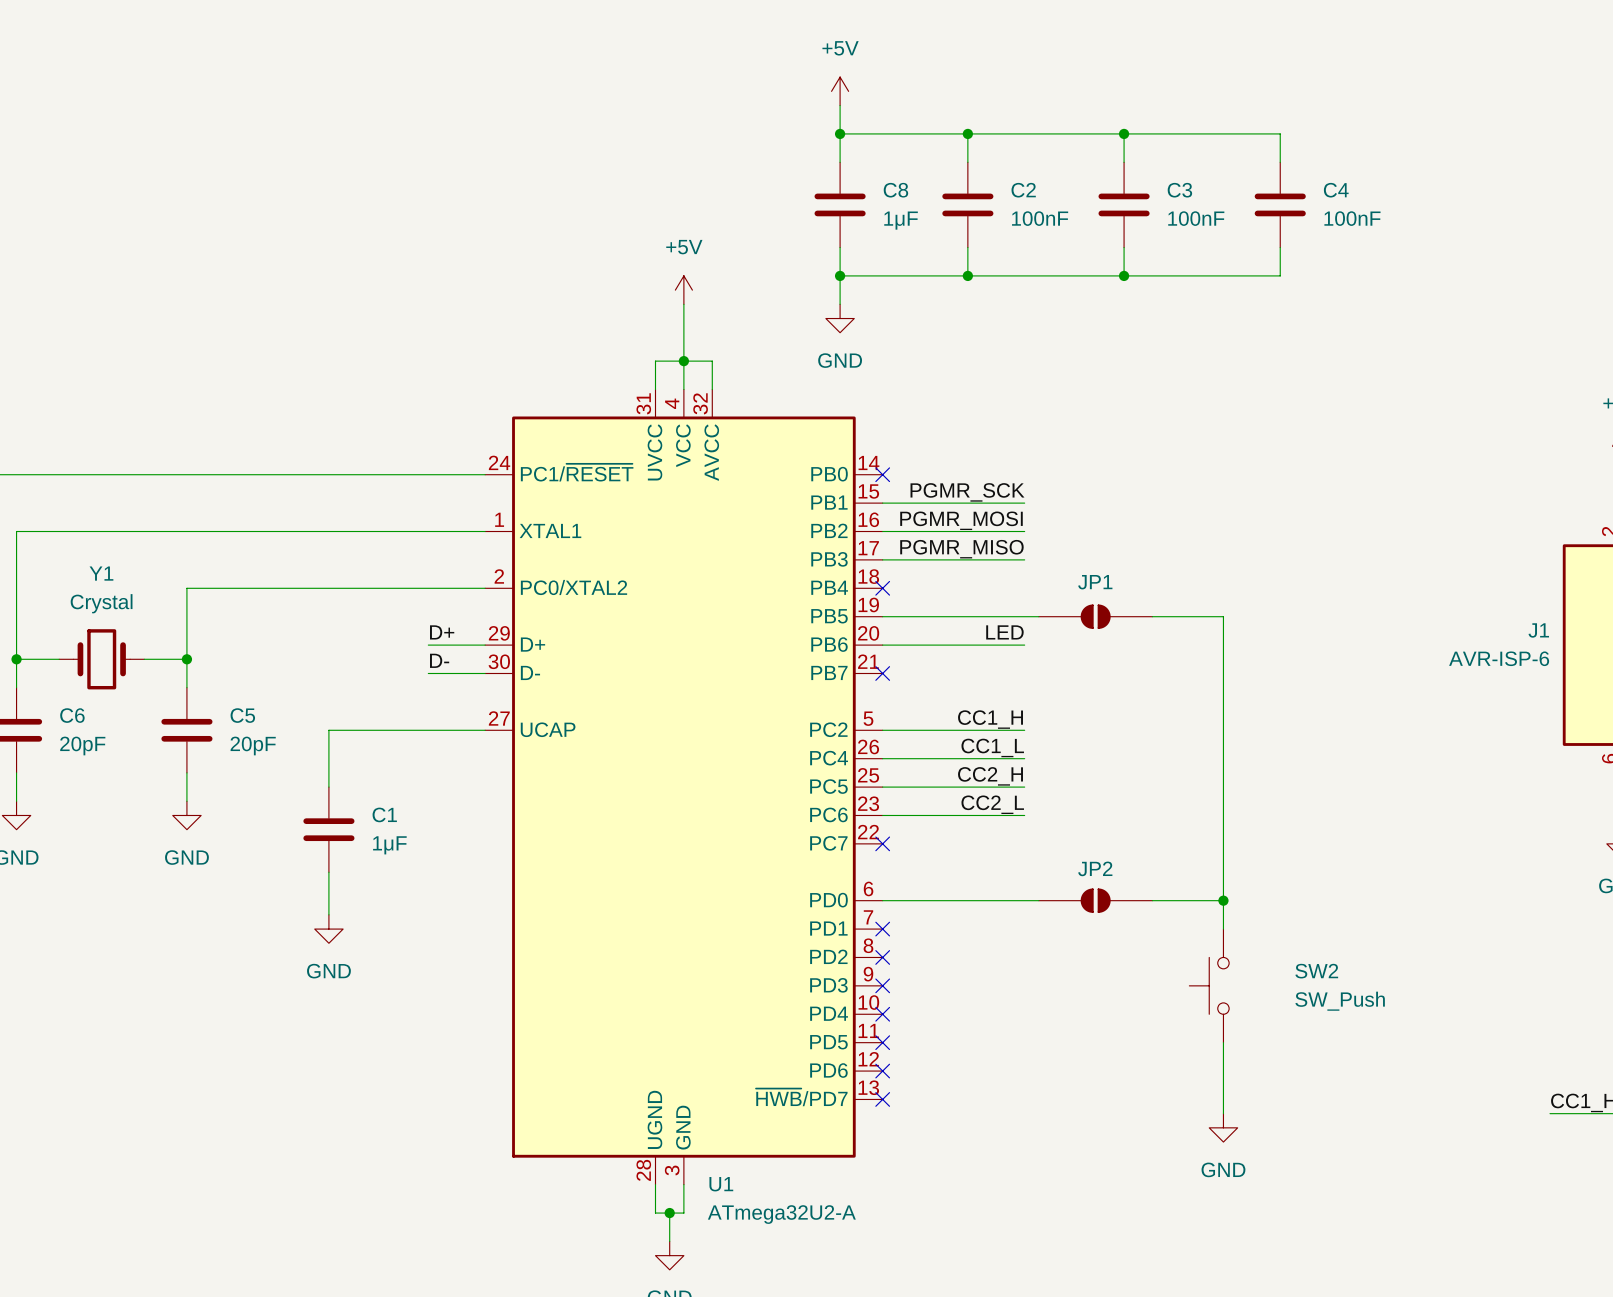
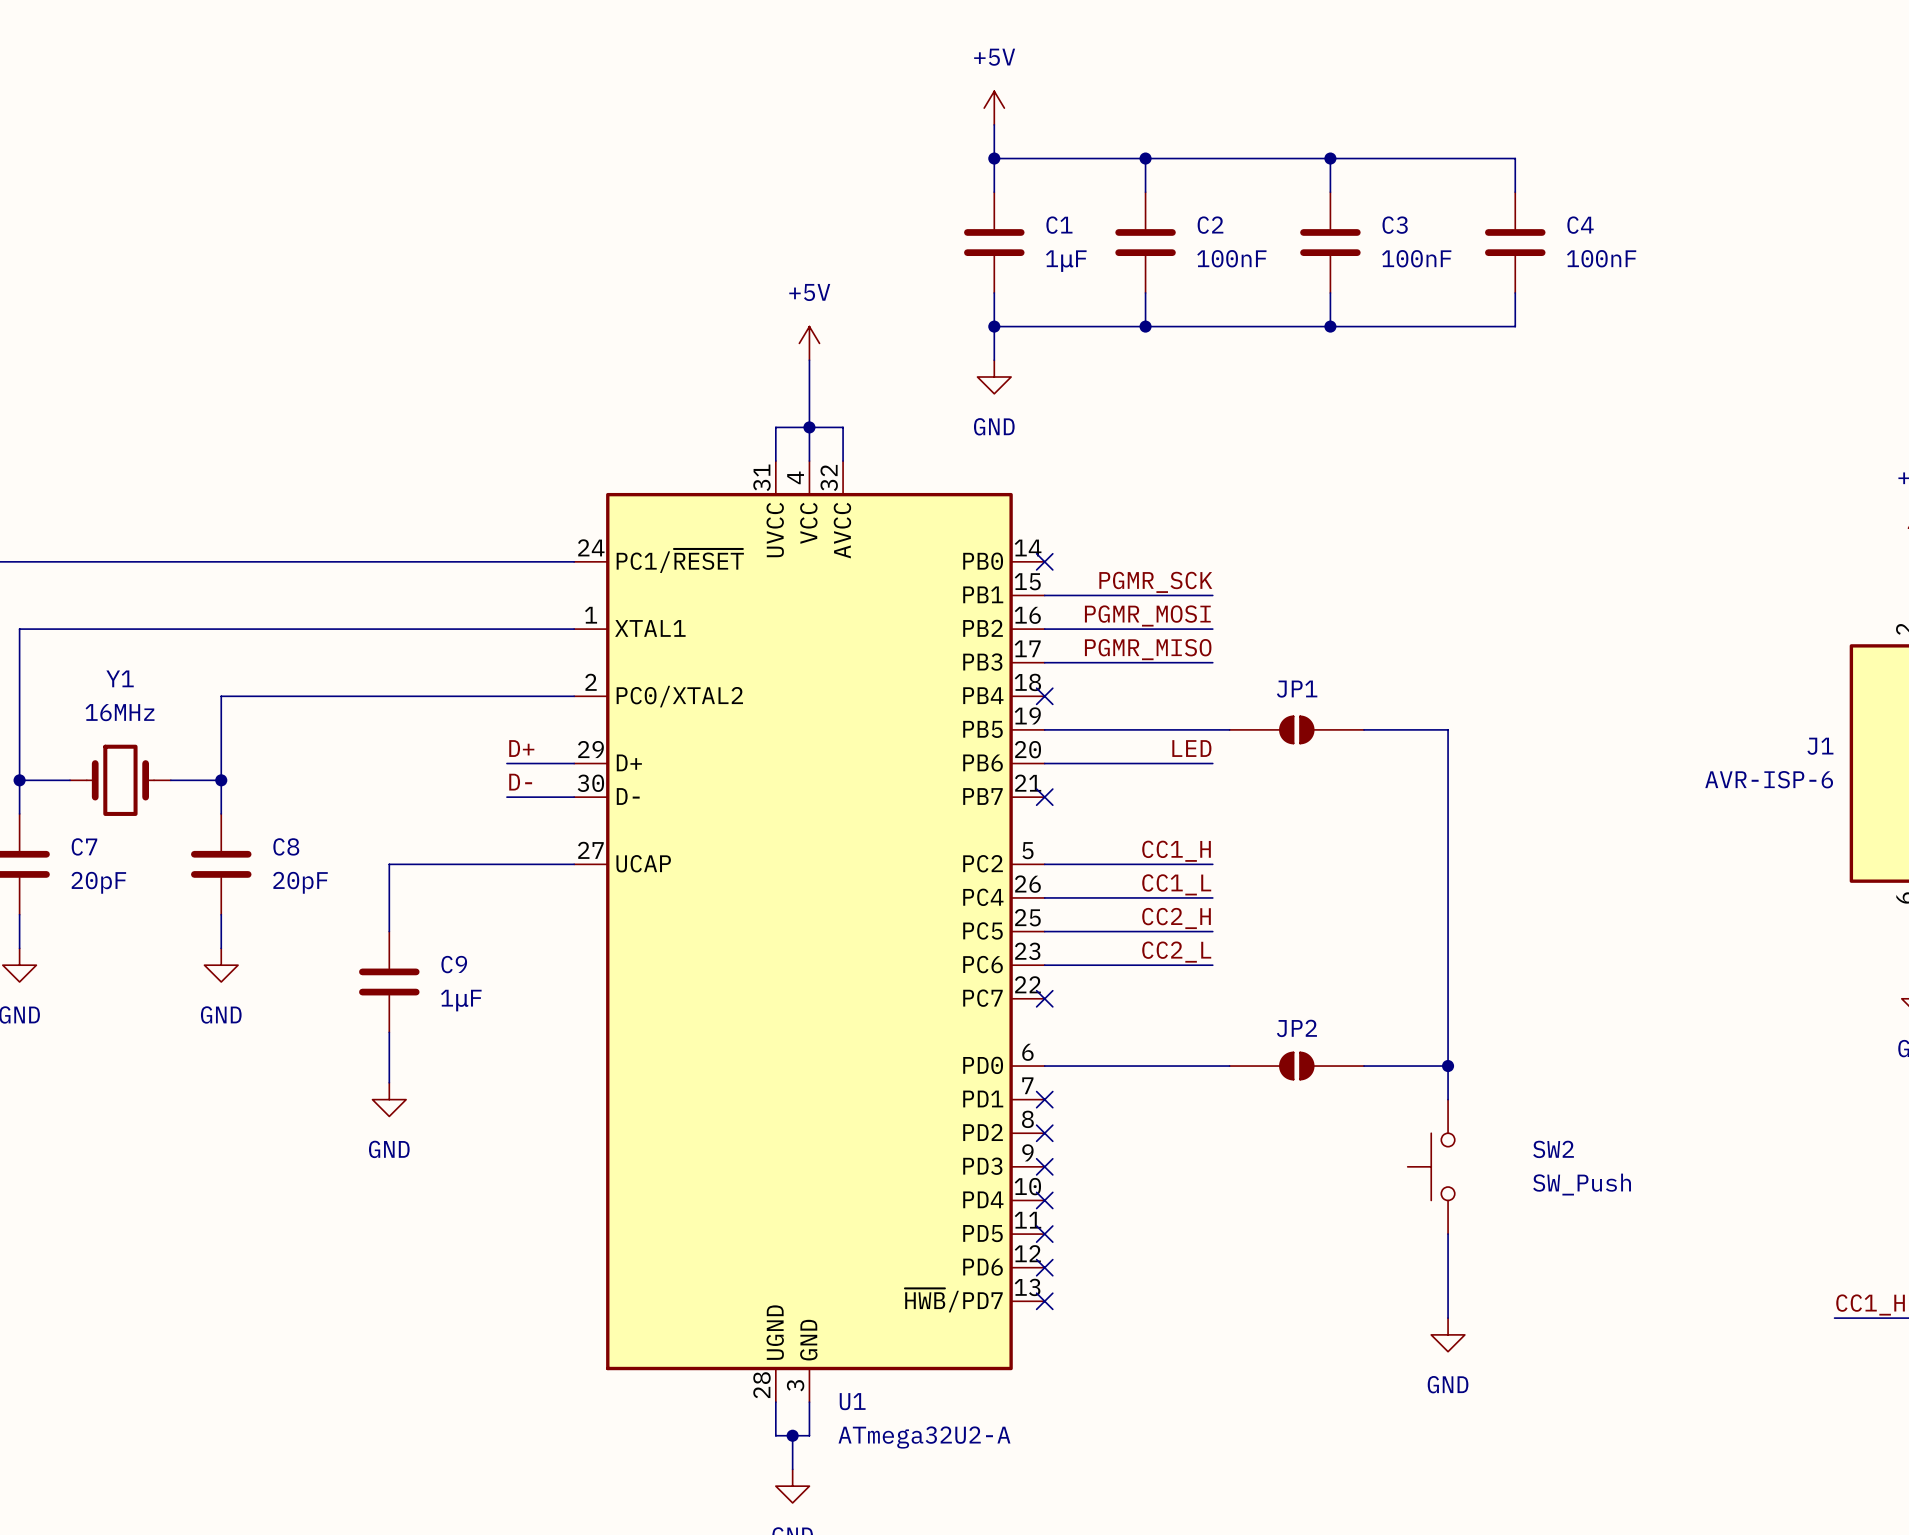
C8 name: C8 (895, 190) -> C1 (1059, 225)
Y1 value: Crystal (101, 603) -> 16MHz (120, 712)
C6 name: C6 (72, 715) -> C7 (84, 846)
C5 name: C5 (242, 715) -> C8 (286, 846)
C1 name: C1 (384, 814) -> C9 (454, 964)

